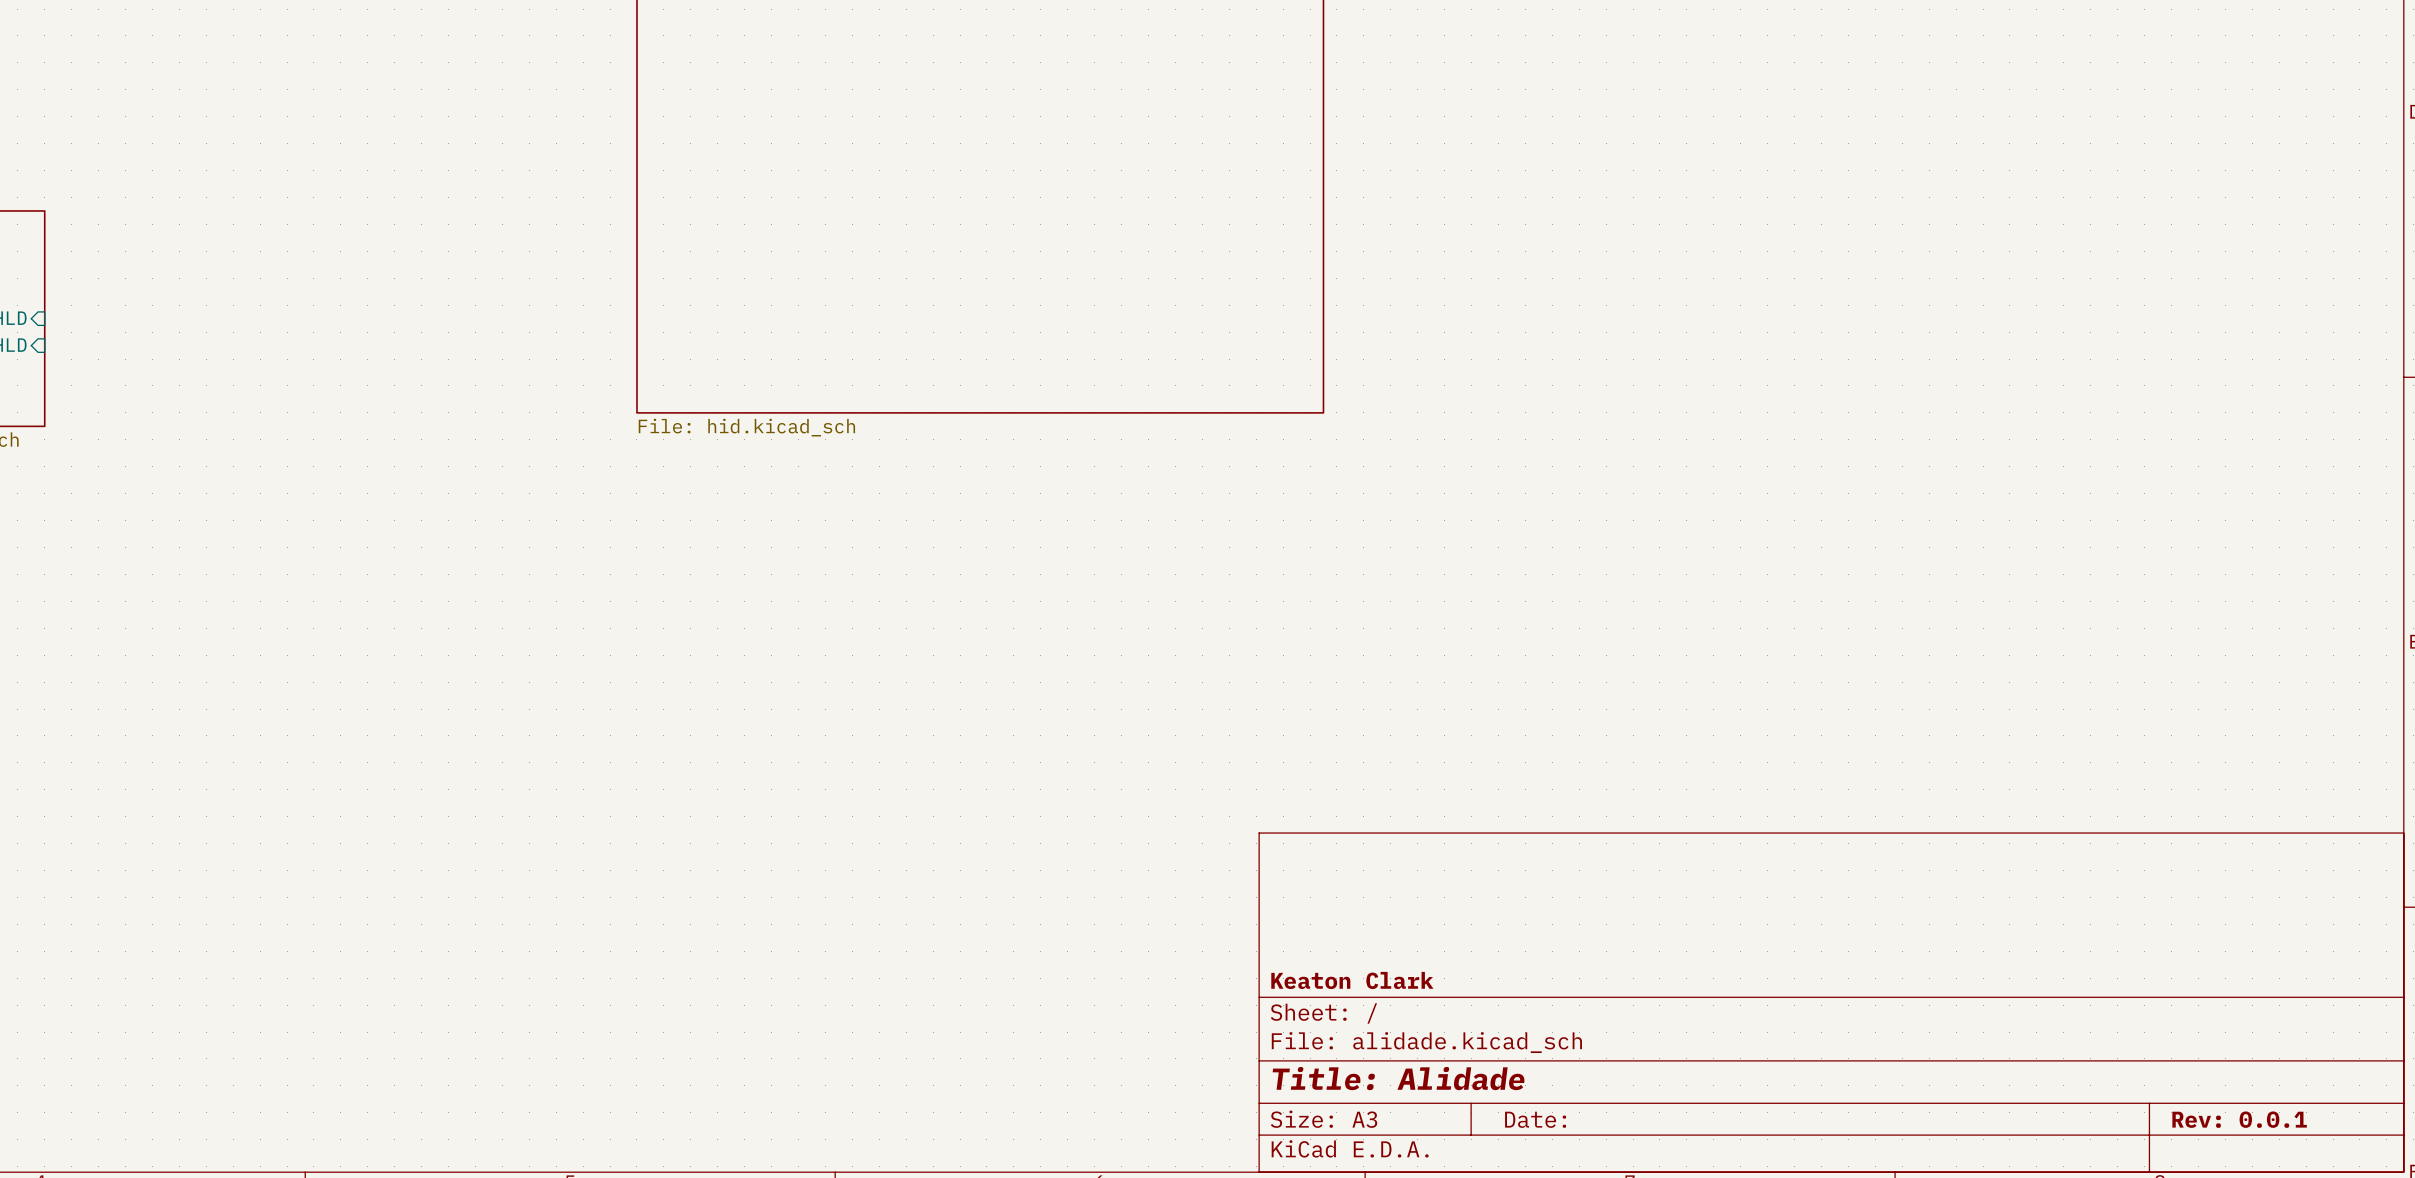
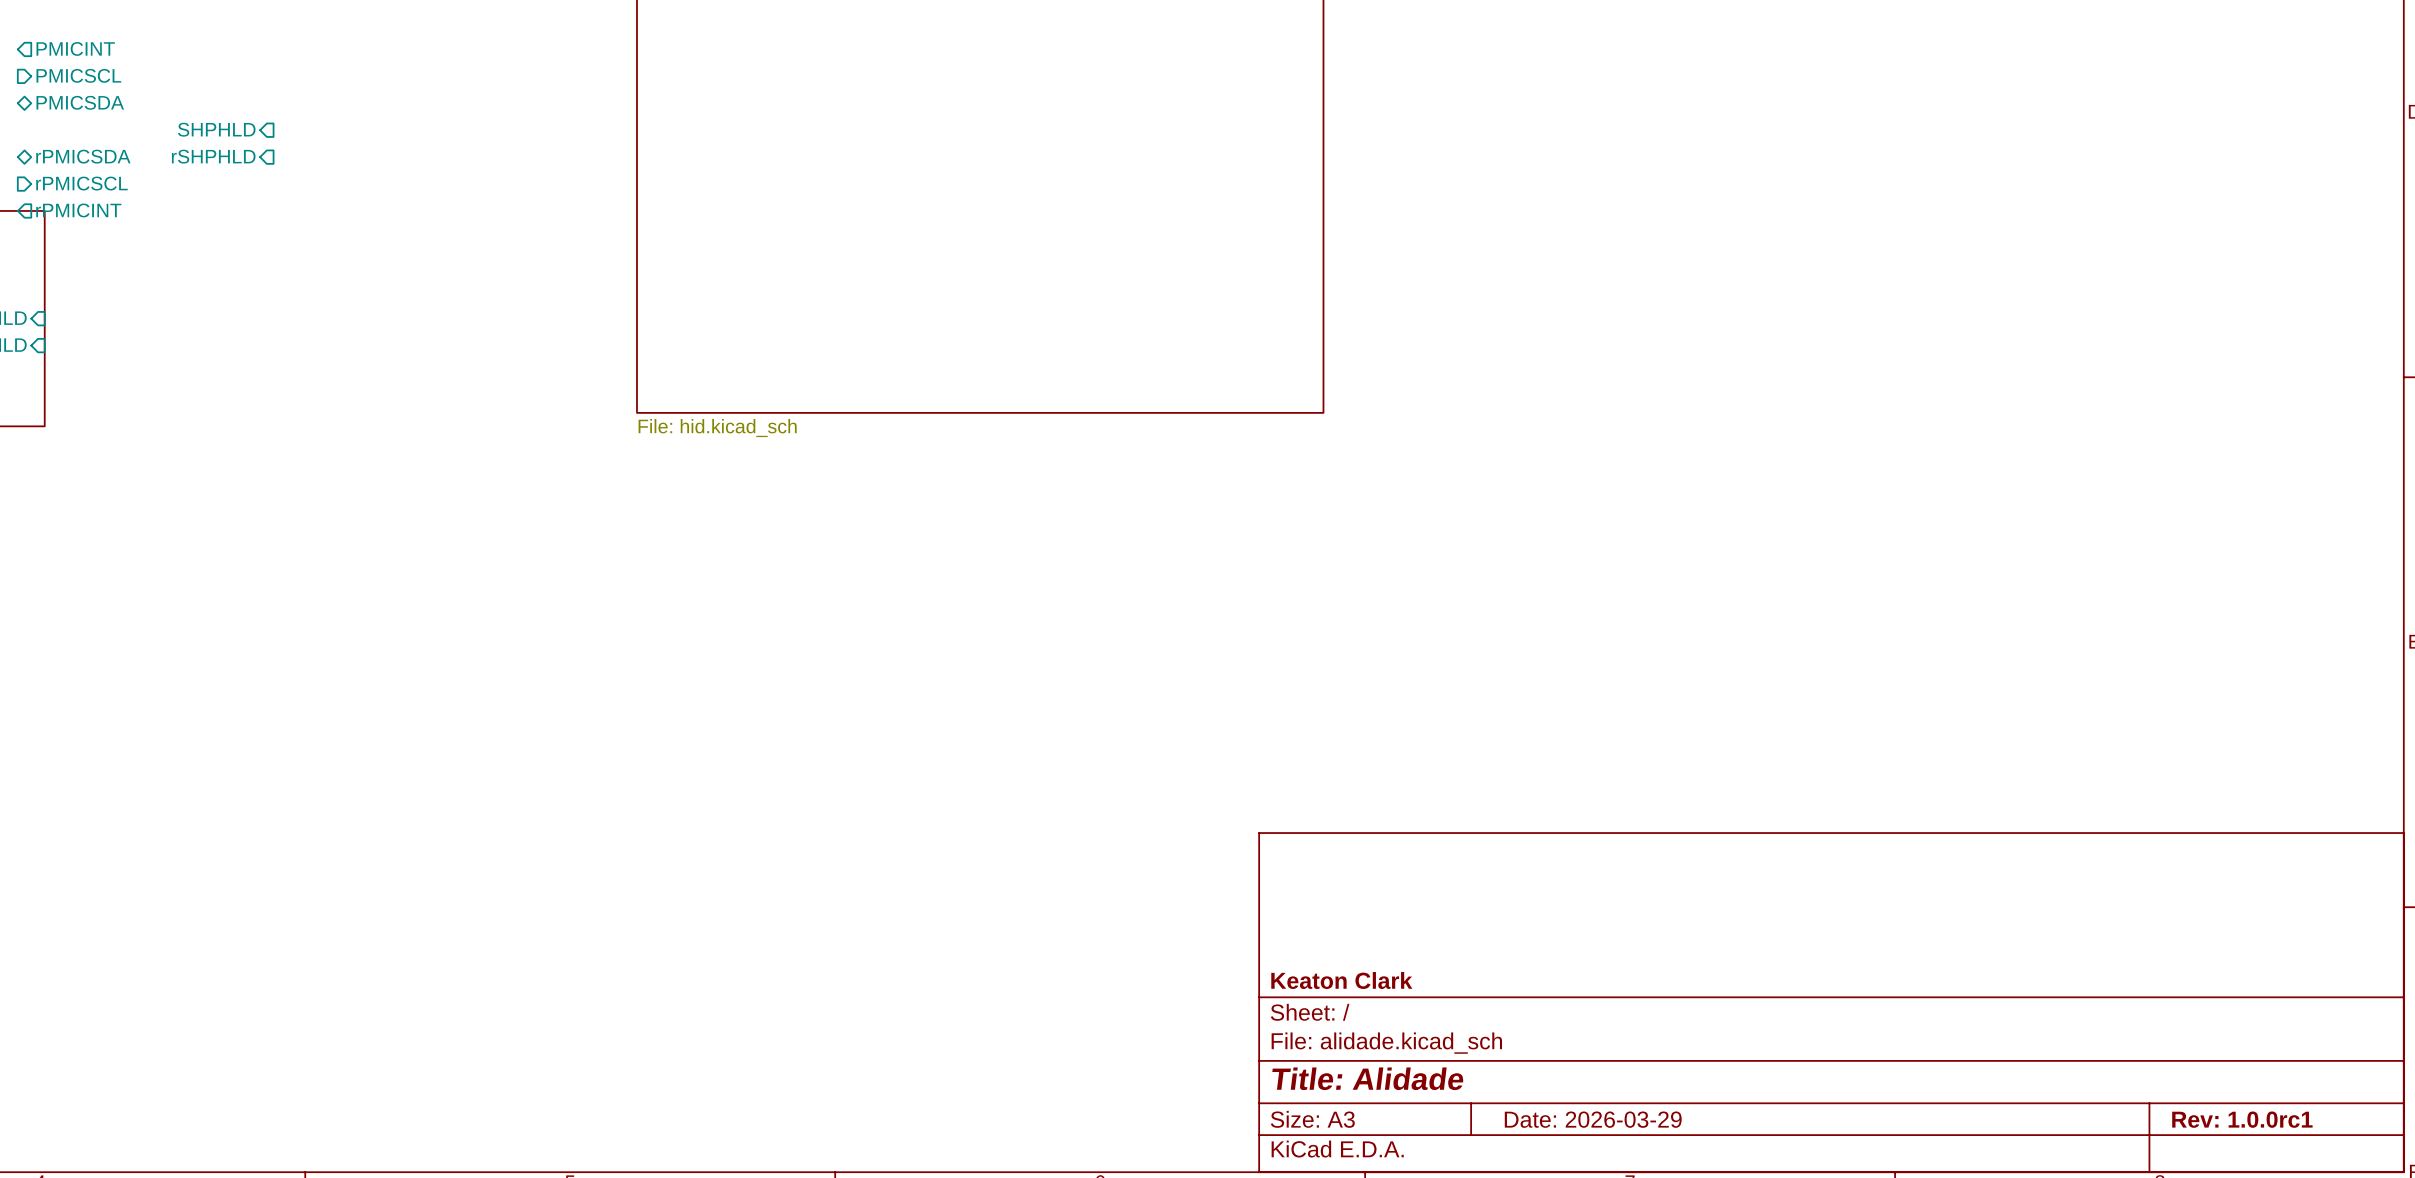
sheet pin: none -> PMICINT (75, 48)
sheet pin: none -> PMICSCL (78, 75)
sheet pin: none -> PMICSDA (80, 102)
sheet pin: none -> SHPHLD (216, 129)
sheet pin: none -> rPMICSDA (83, 156)
sheet pin: none -> rSHPHLD (213, 156)
sheet pin: none -> rPMICSCL (81, 183)
sheet pin: none -> rPMICINT (78, 210)
title block: Date: (1535, 1119) -> Date: 2026-03-29 (1593, 1119)
title block: Rev: 0.0.1 (2239, 1119) -> Rev: 1.0.0rc1 (2242, 1119)

